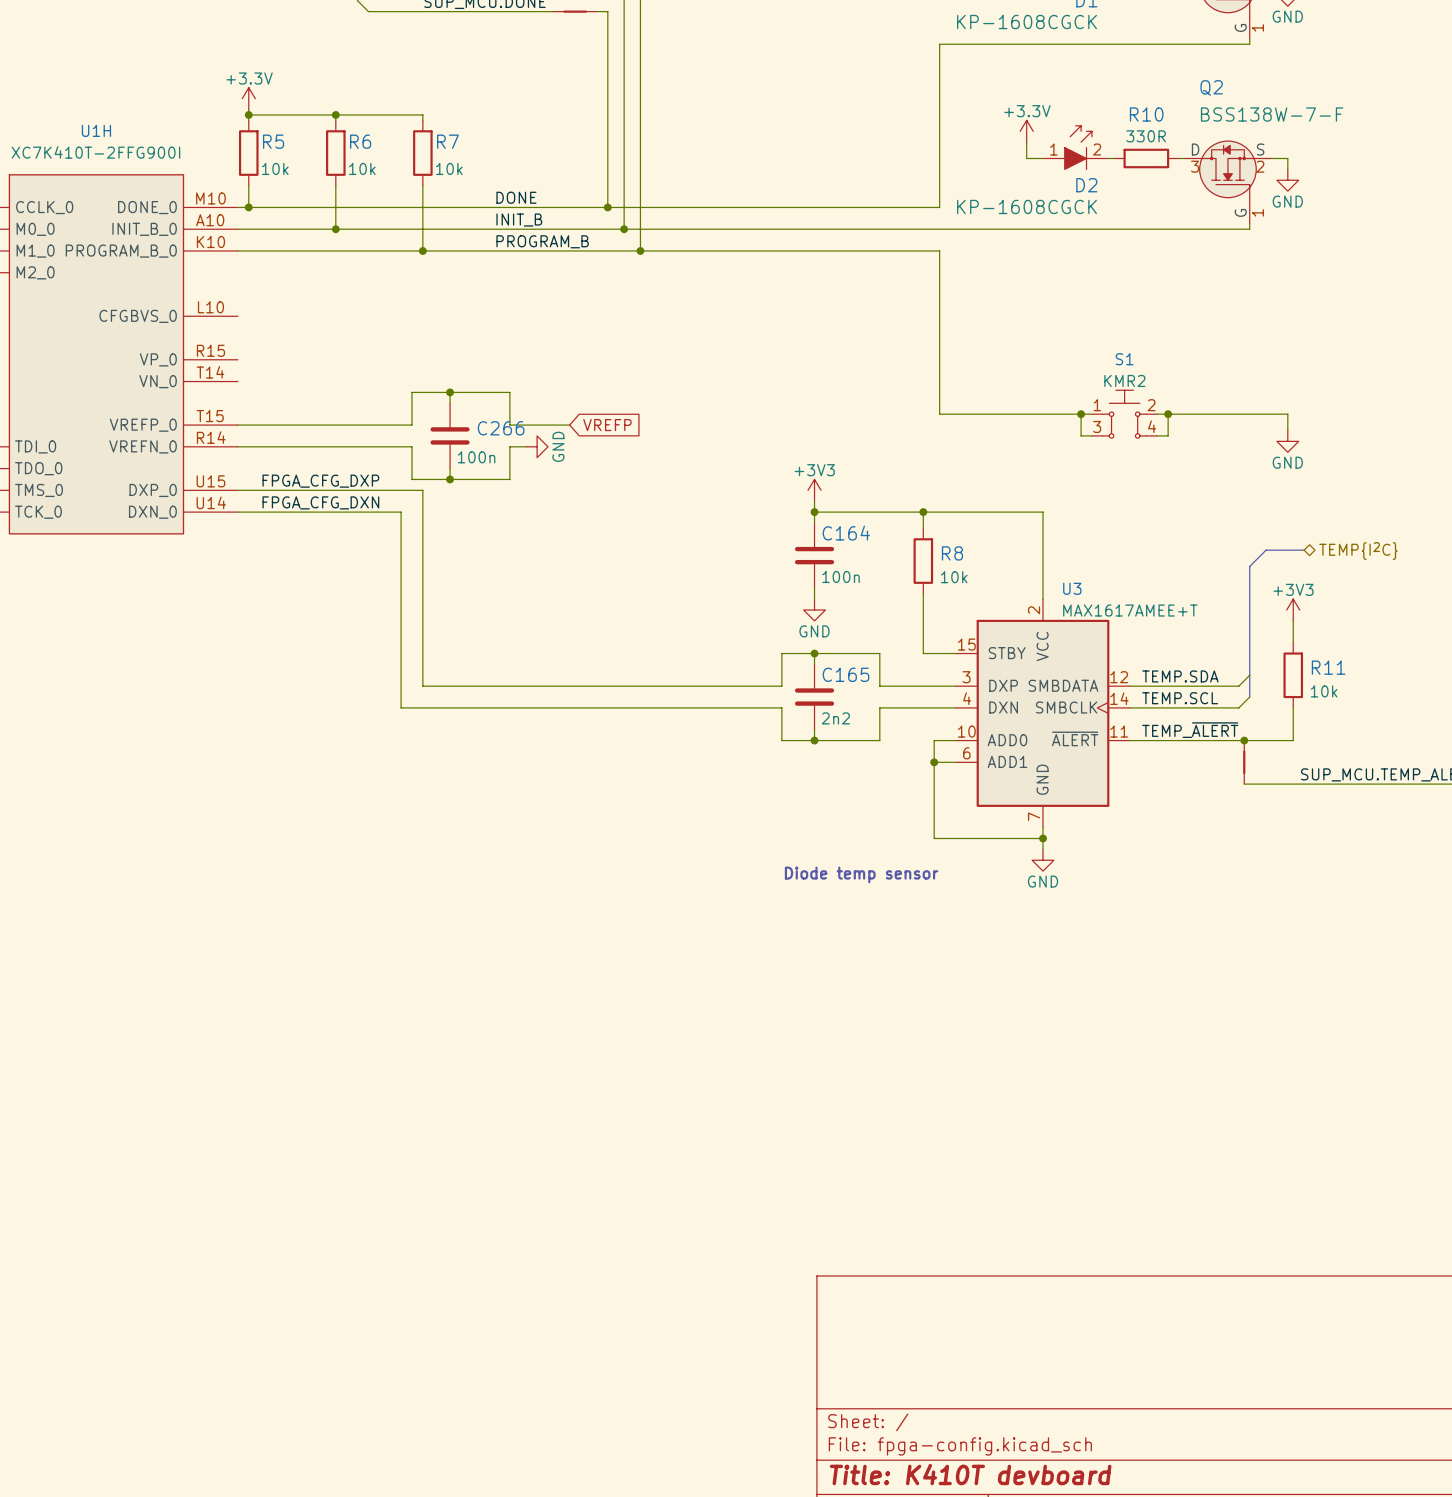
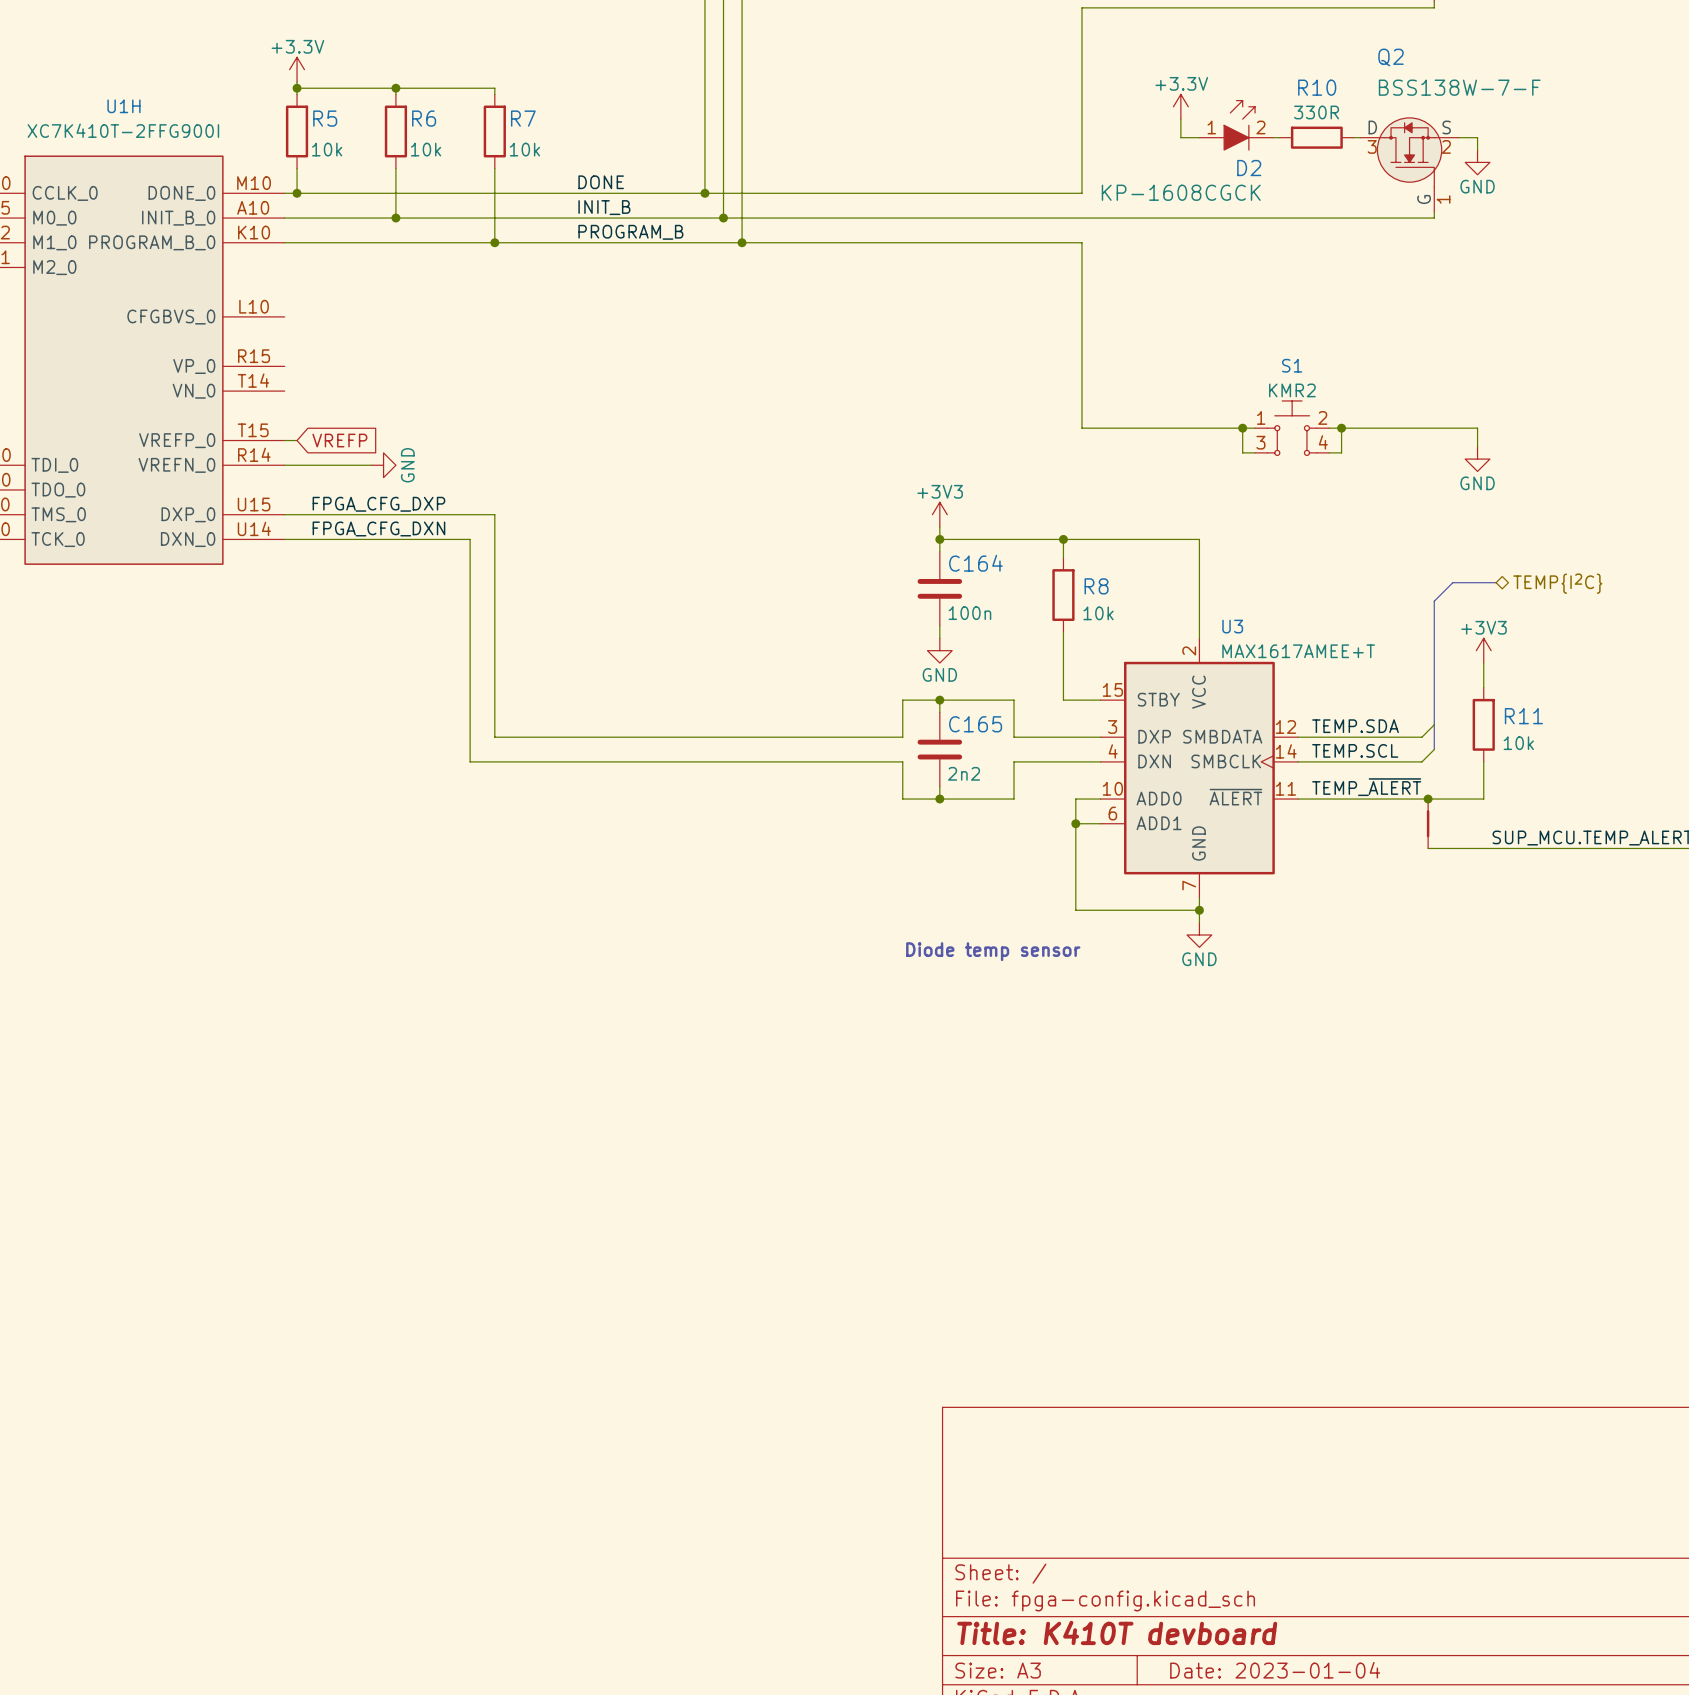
wire: (450, 392) (450, 403) -> none
junction: (450, 392) -> none
wire: (248, 425) (411, 425) (411, 392) (509, 392) (509, 425) (569, 425) -> none
global label: none -> VREFP (339, 440)
global label: VREFP (607, 425) -> none
C266: (450, 435) -> none
wire: (314, 446) (411, 446) (411, 479) (509, 479) (509, 446) (526, 446) -> none
power symbol position: GND (537, 446) -> GND (383, 465)
wire: (450, 468) (450, 479) -> none
junction: (450, 479) -> none

